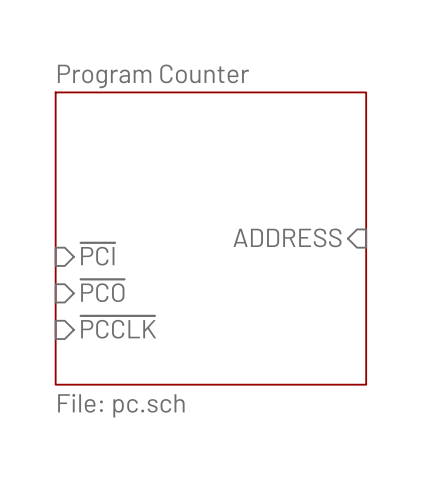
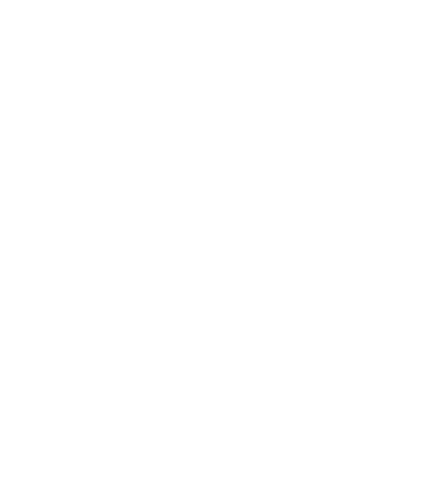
sheet pin: ADDRESS (287, 237) -> none
sheet Program Counter: File: pc.sch (210, 238) -> none
sheet pin: ~{PCI} (97, 254) -> none
sheet pin: ~{PCO} (102, 290) -> none
sheet pin: ~{PCCLK} (118, 327) -> none

